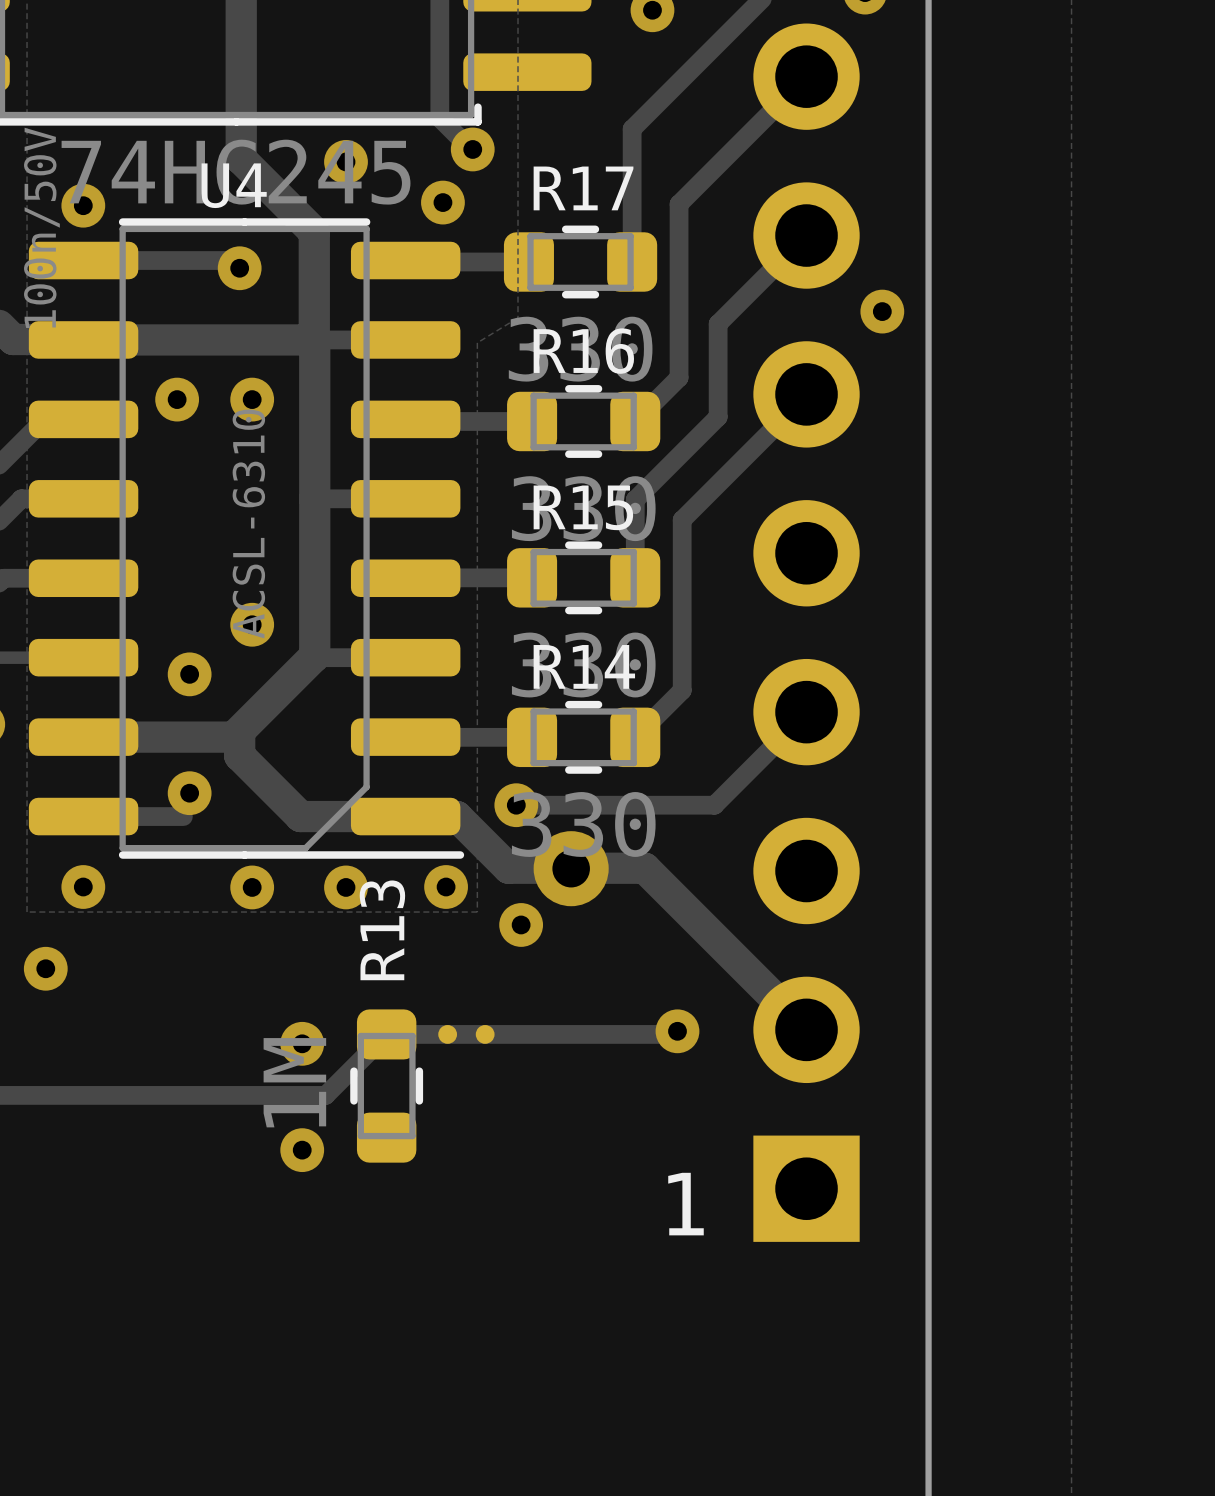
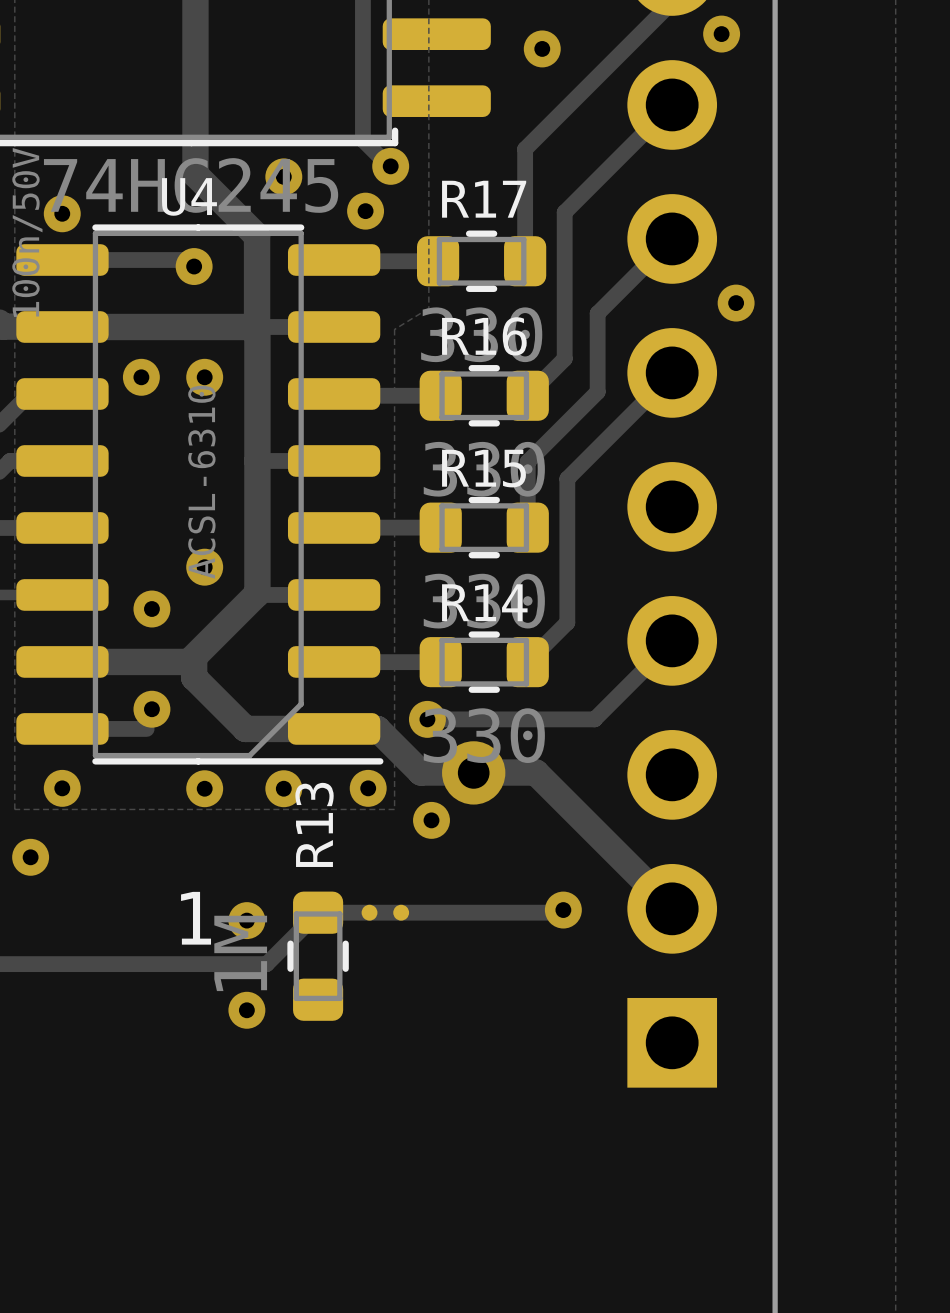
text position: 1 (685, 1204) -> 1 (196, 918)

